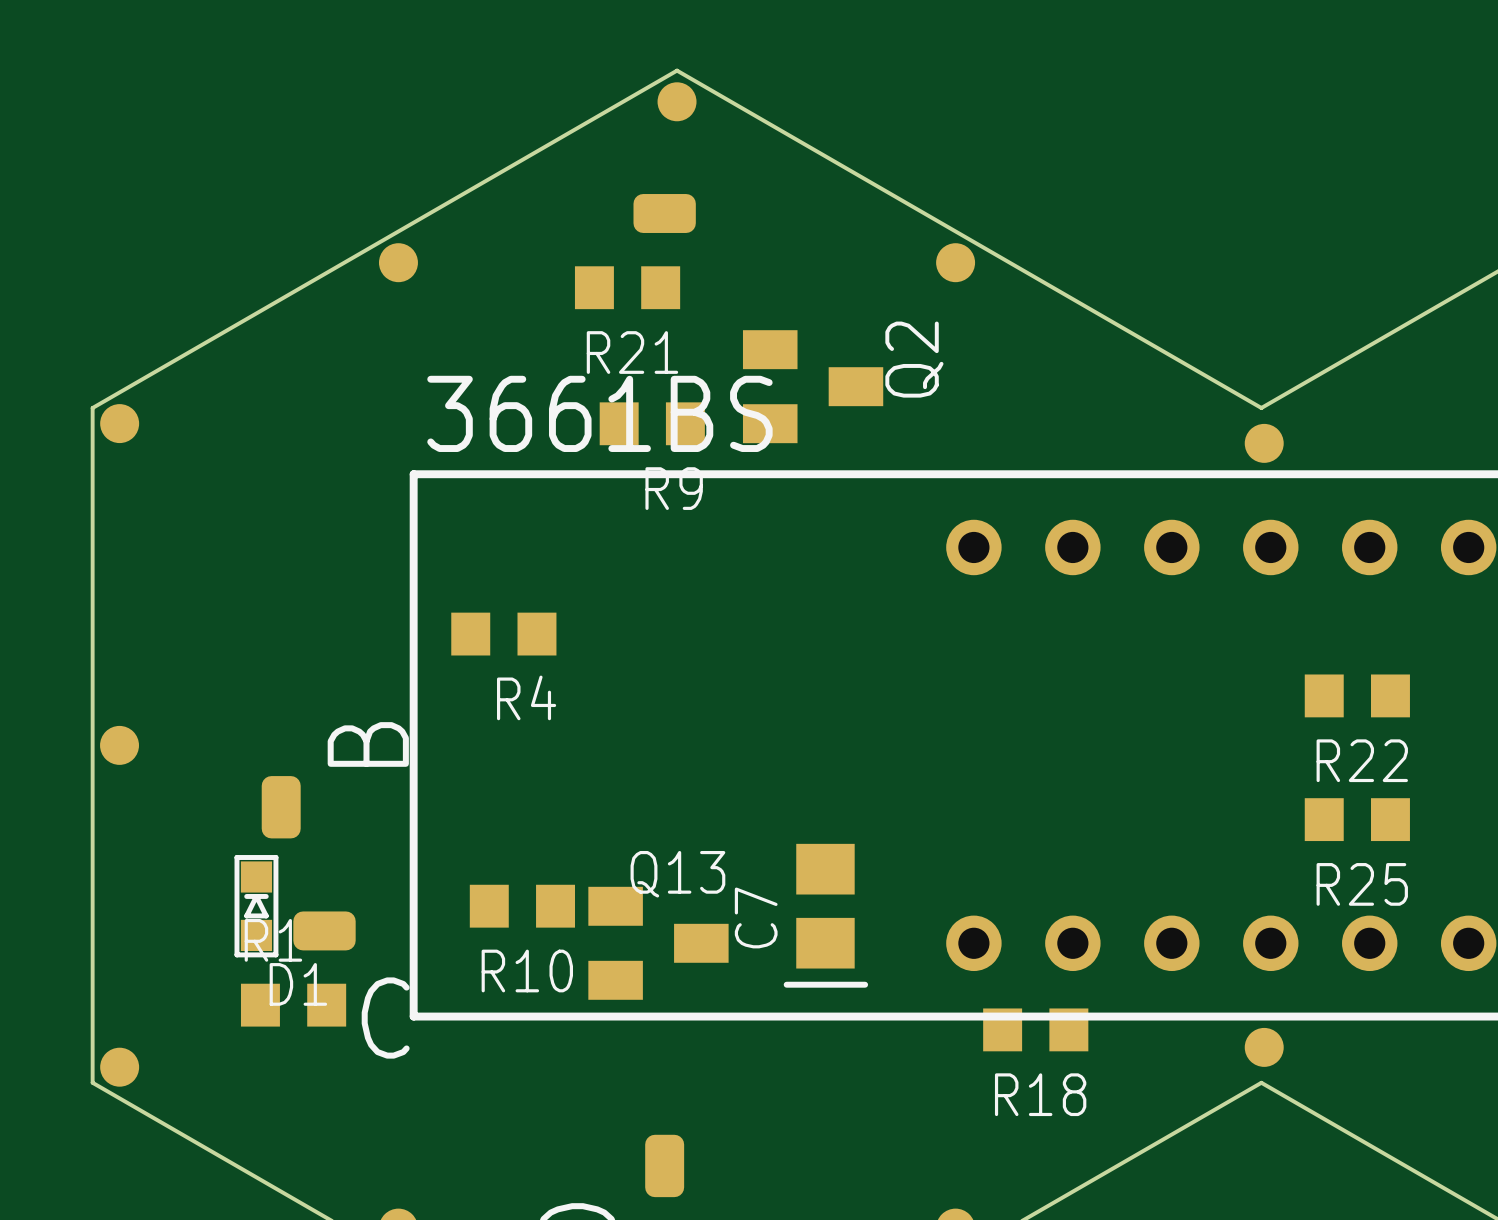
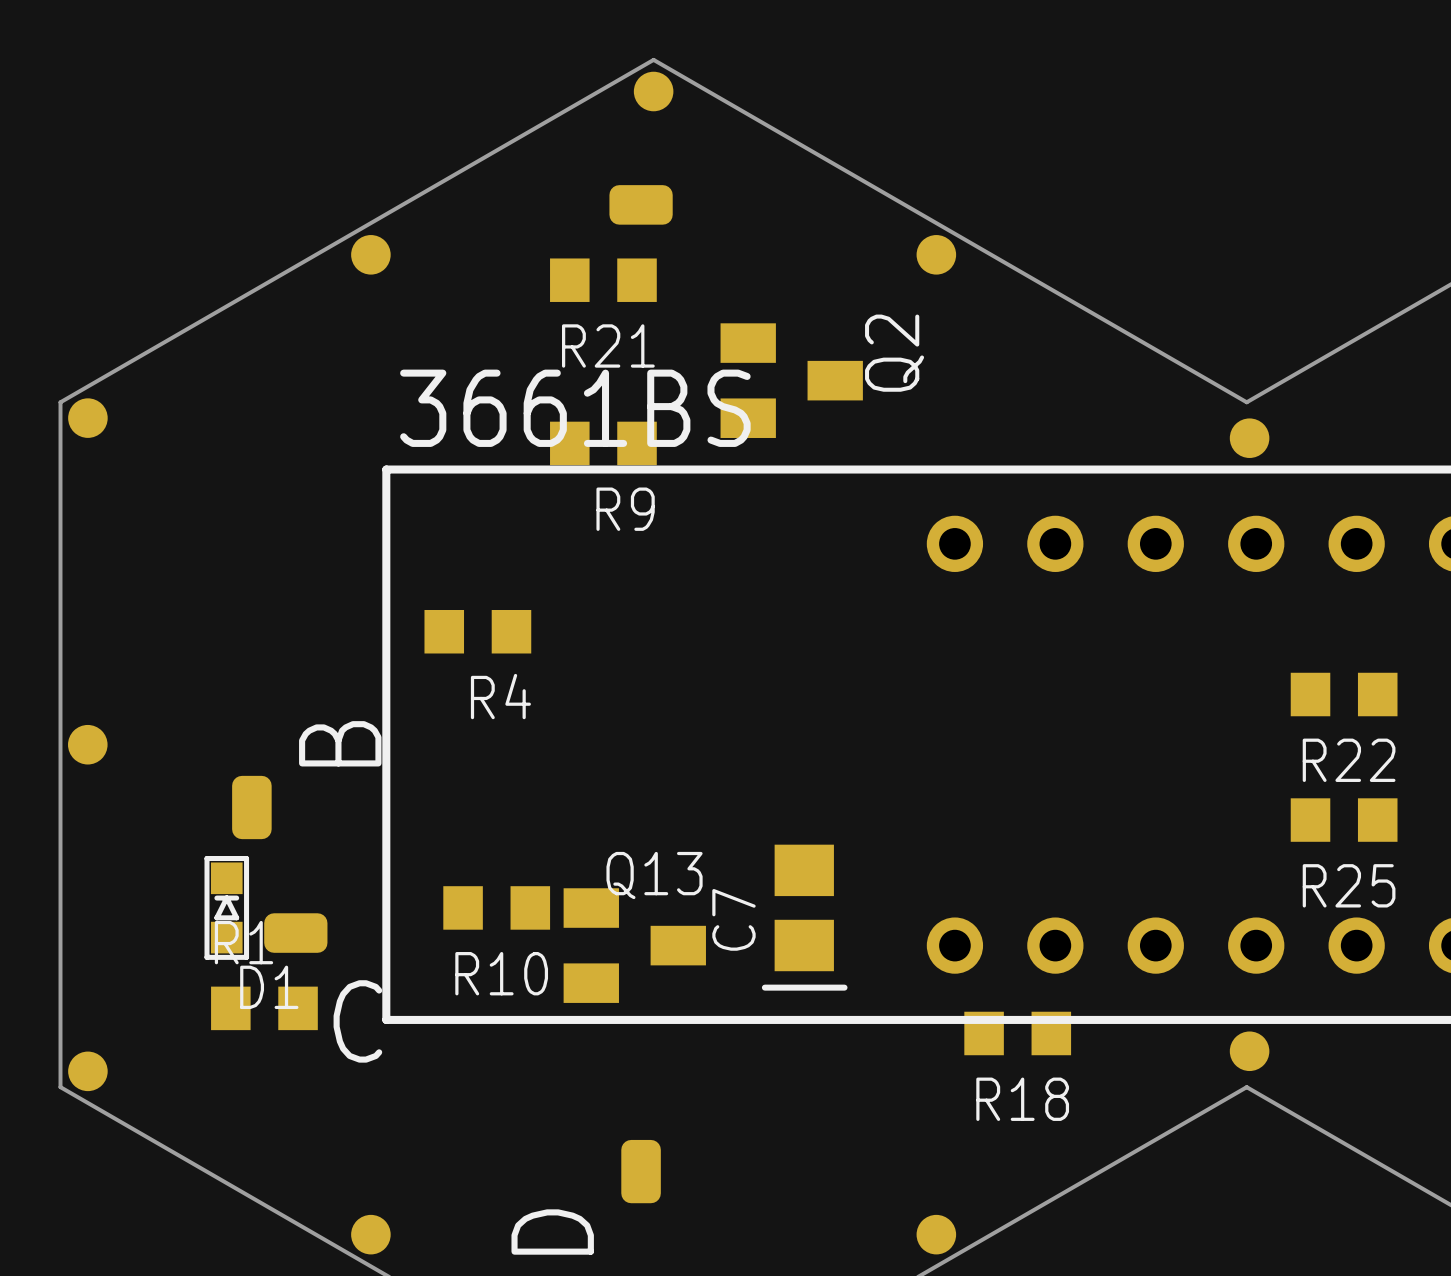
R9 position: (652, 423) -> (603, 443)

